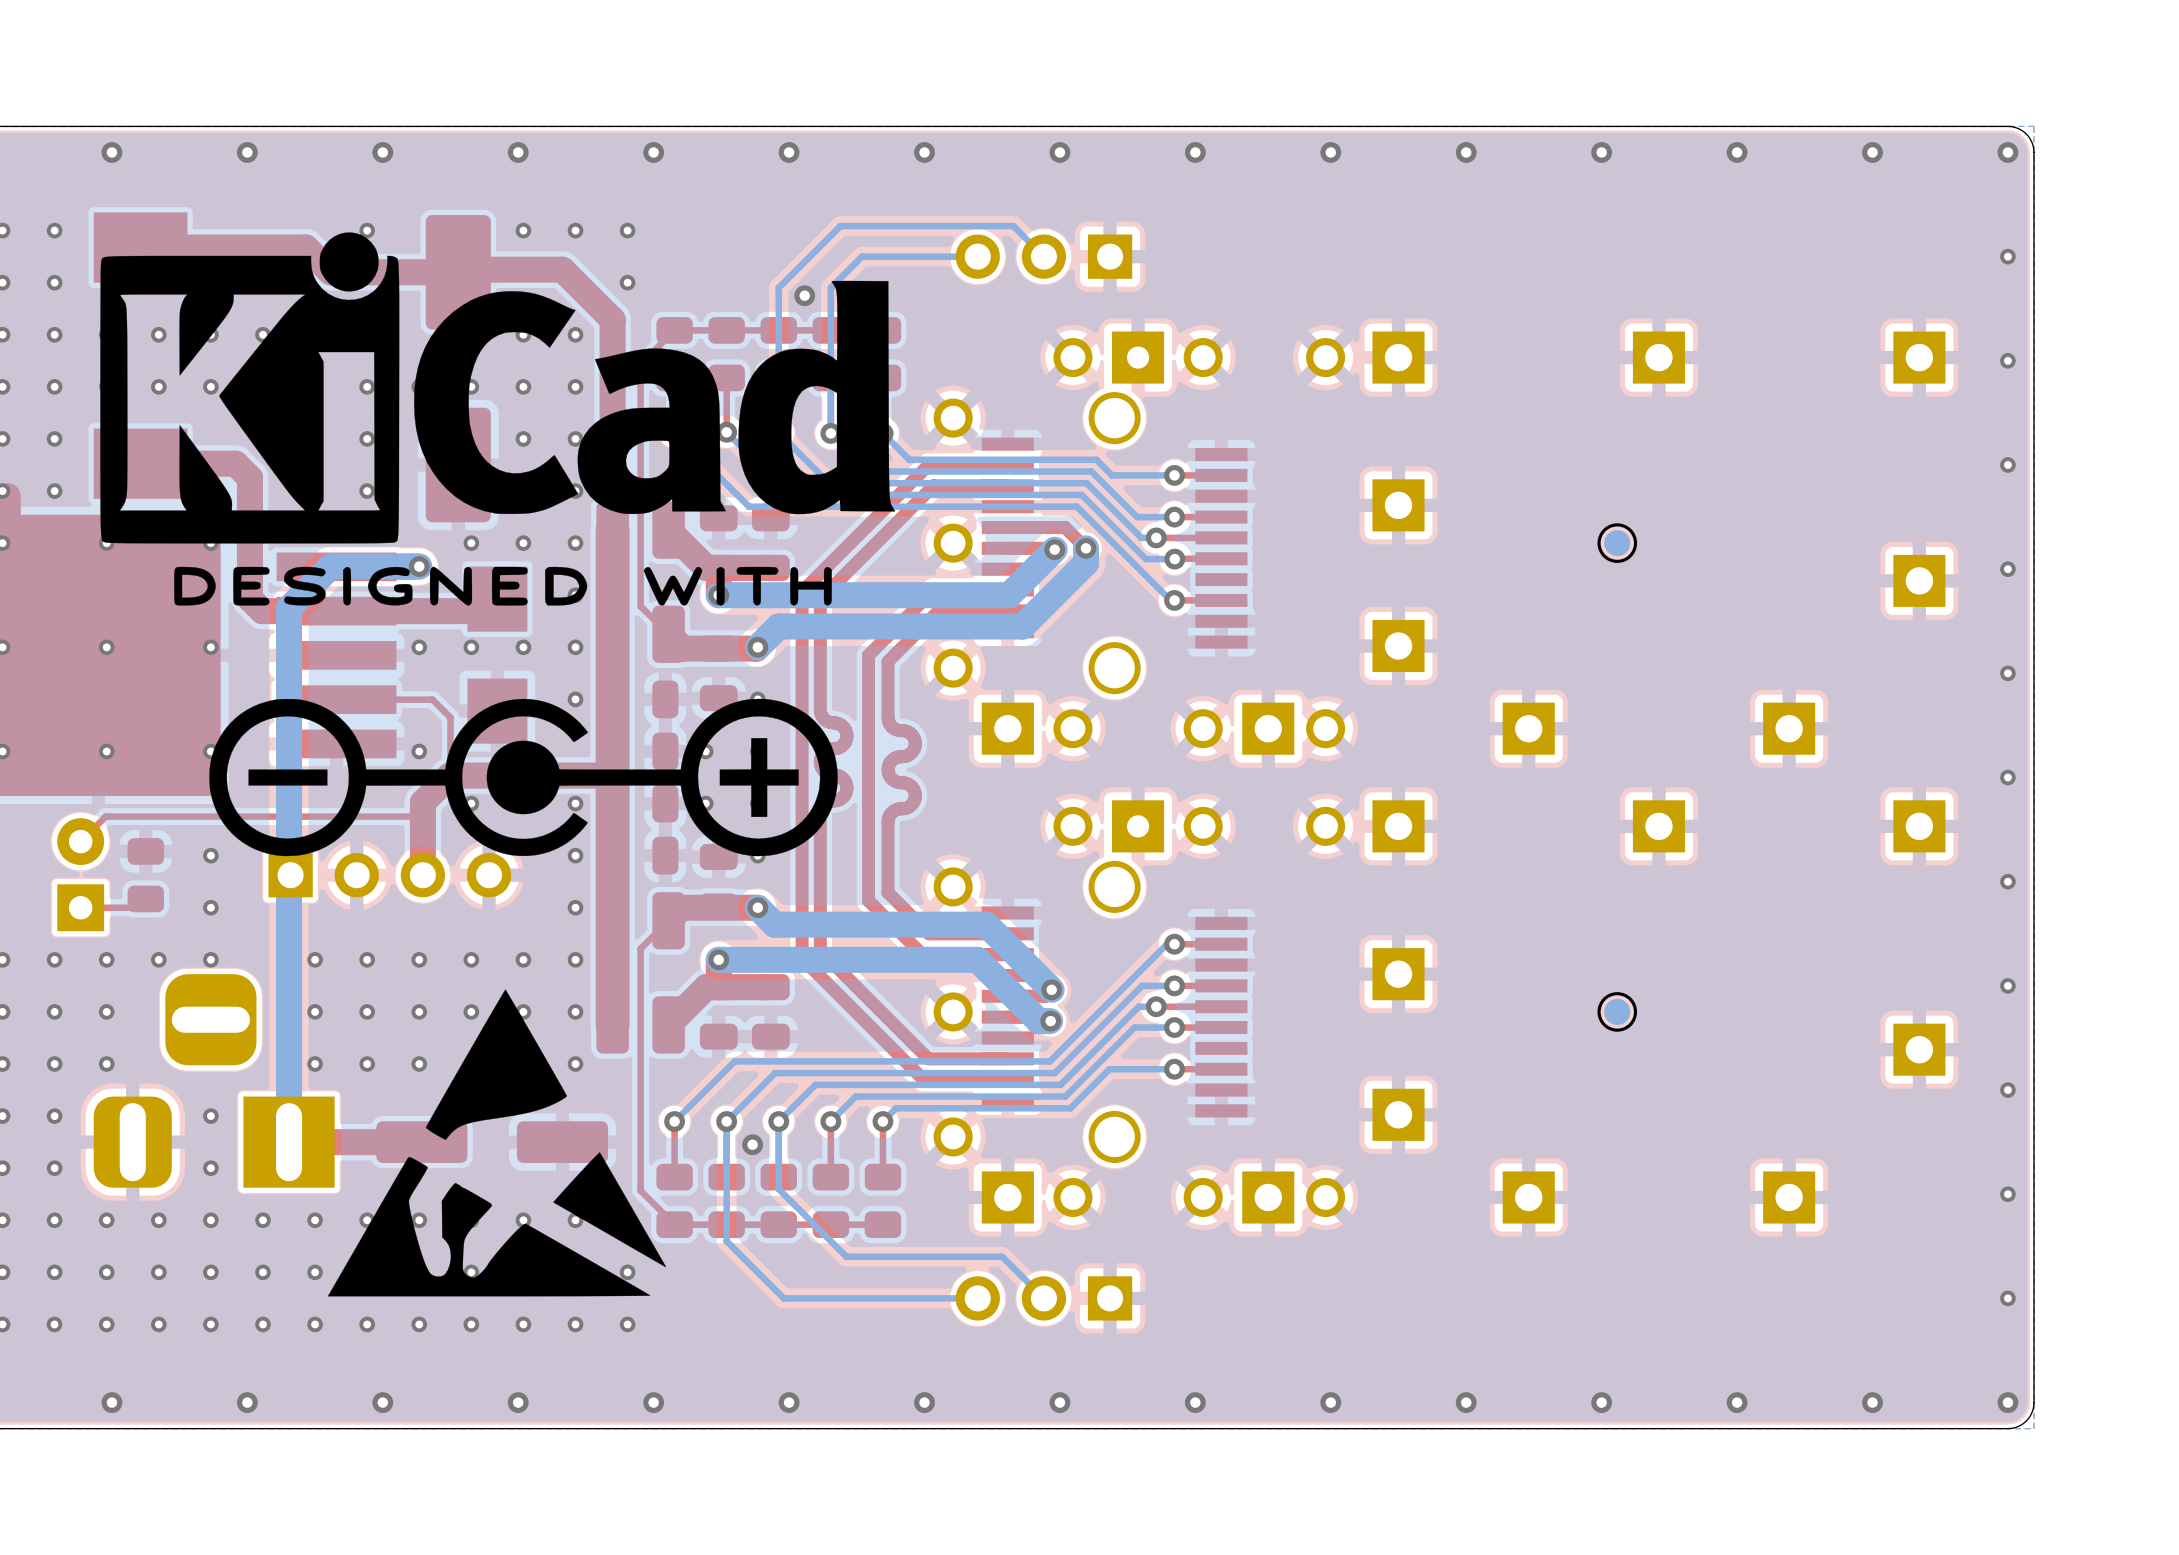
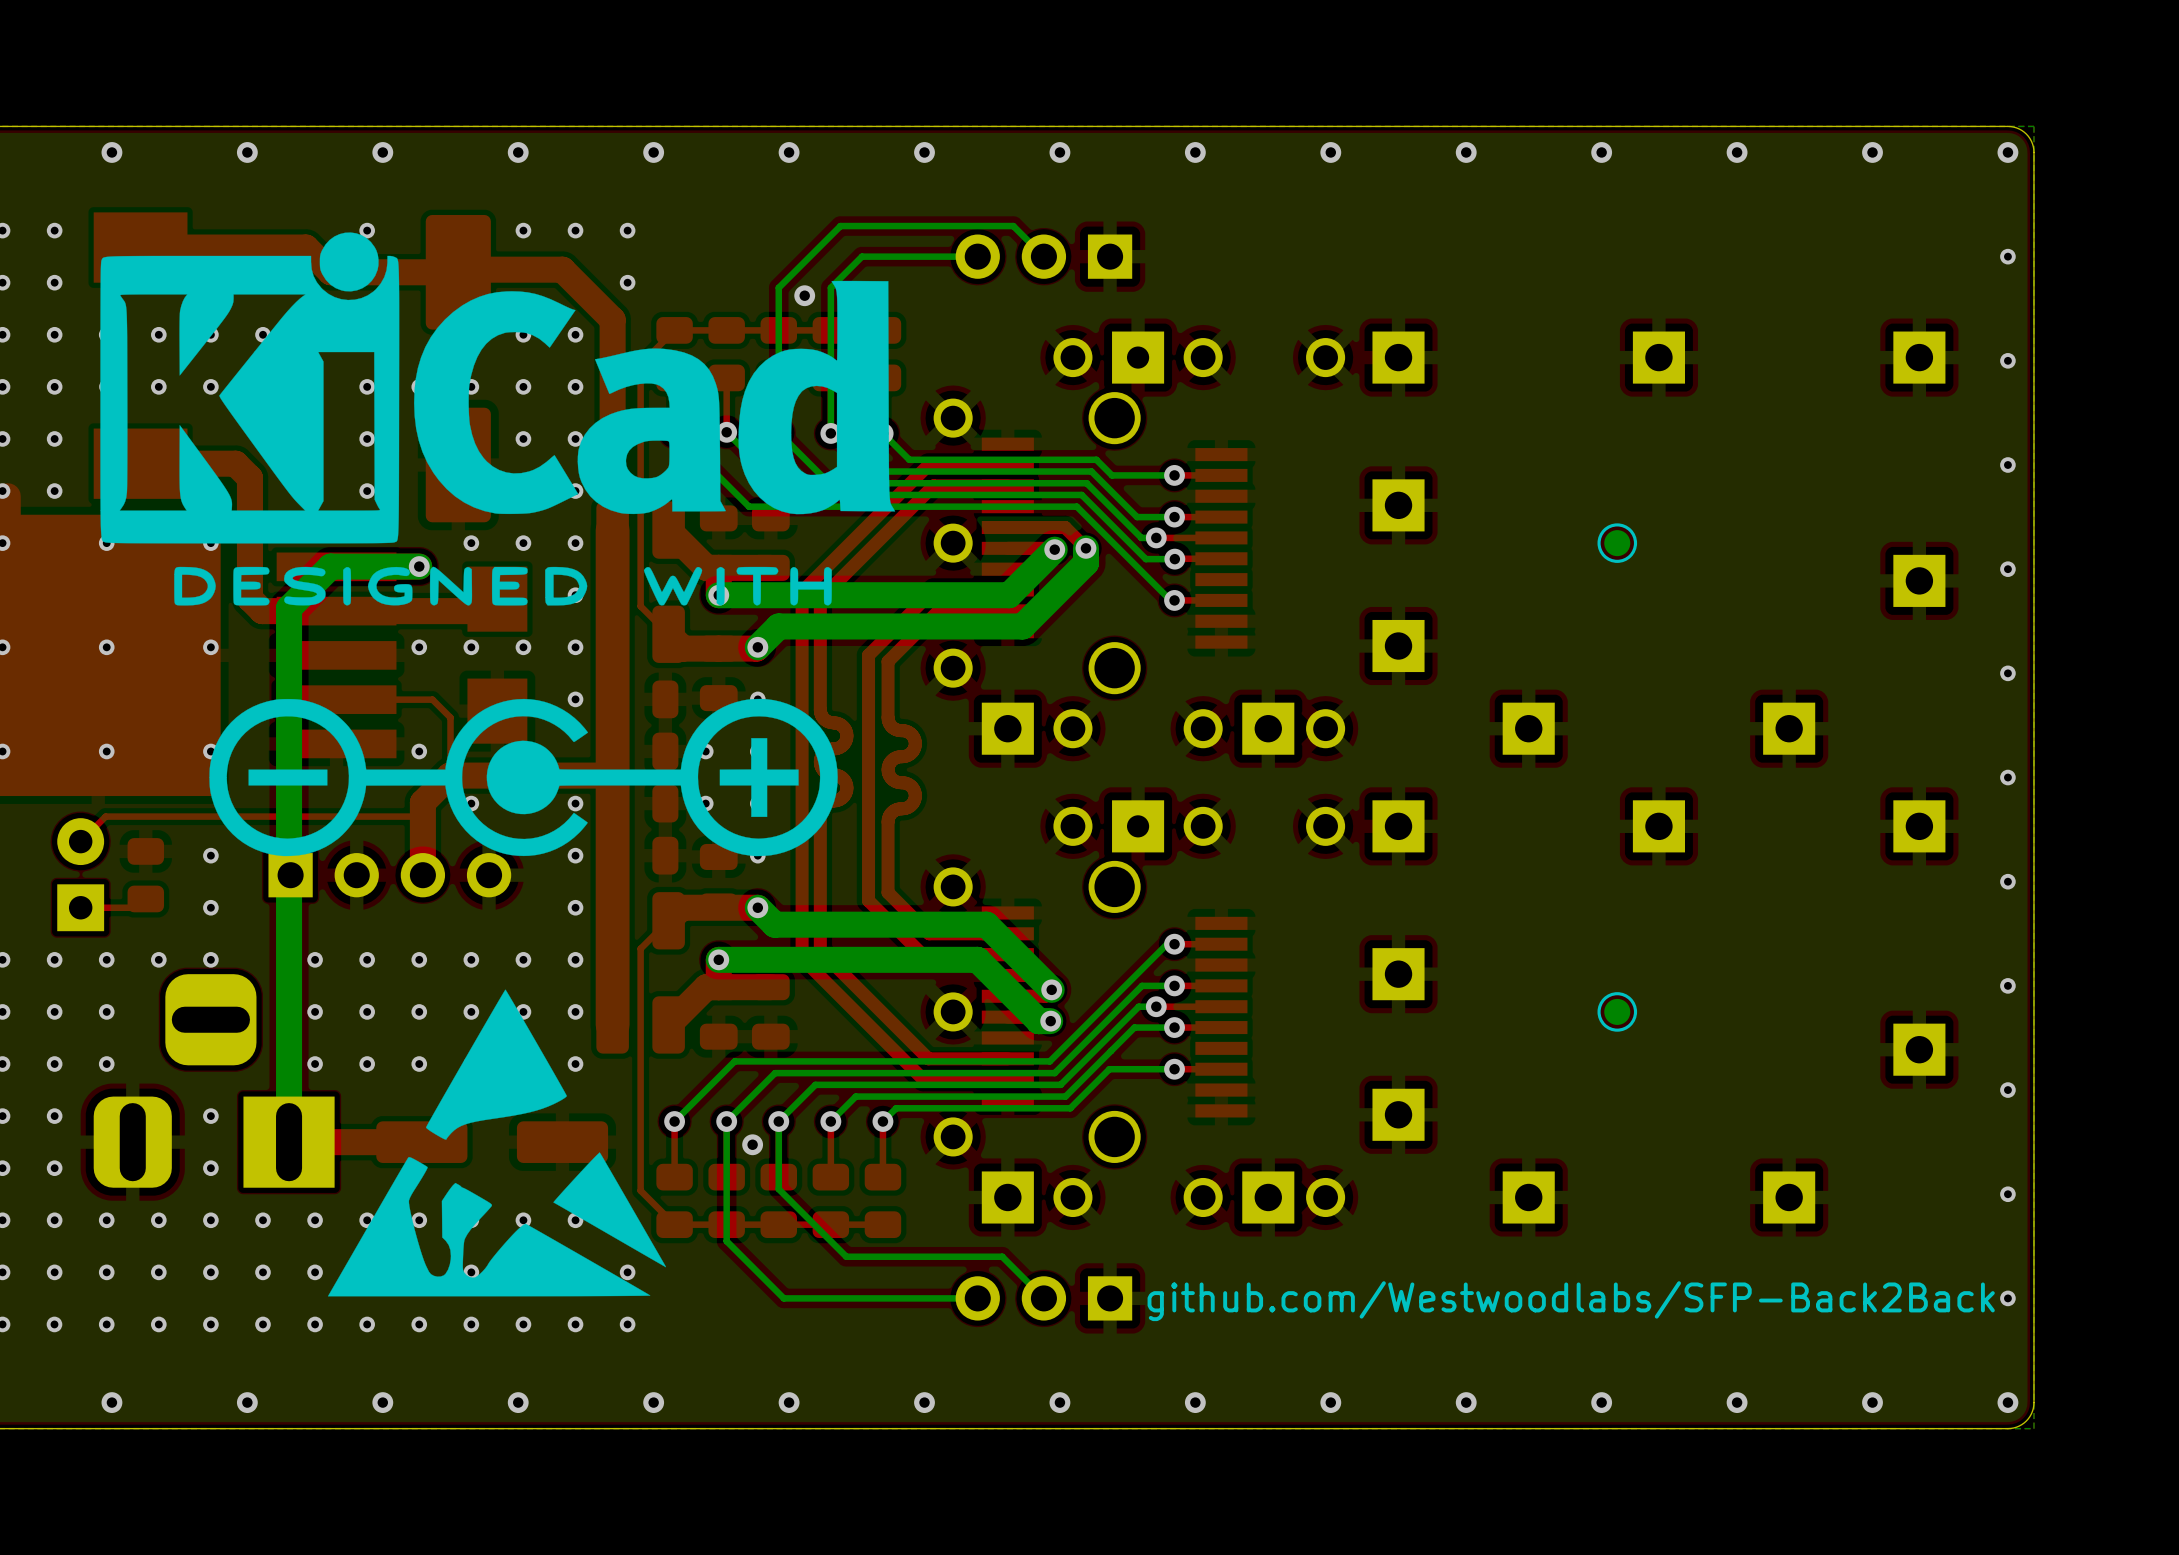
text: none -> github.com/Westwoodlabs/SFP-Back2Back (1571, 1301)

